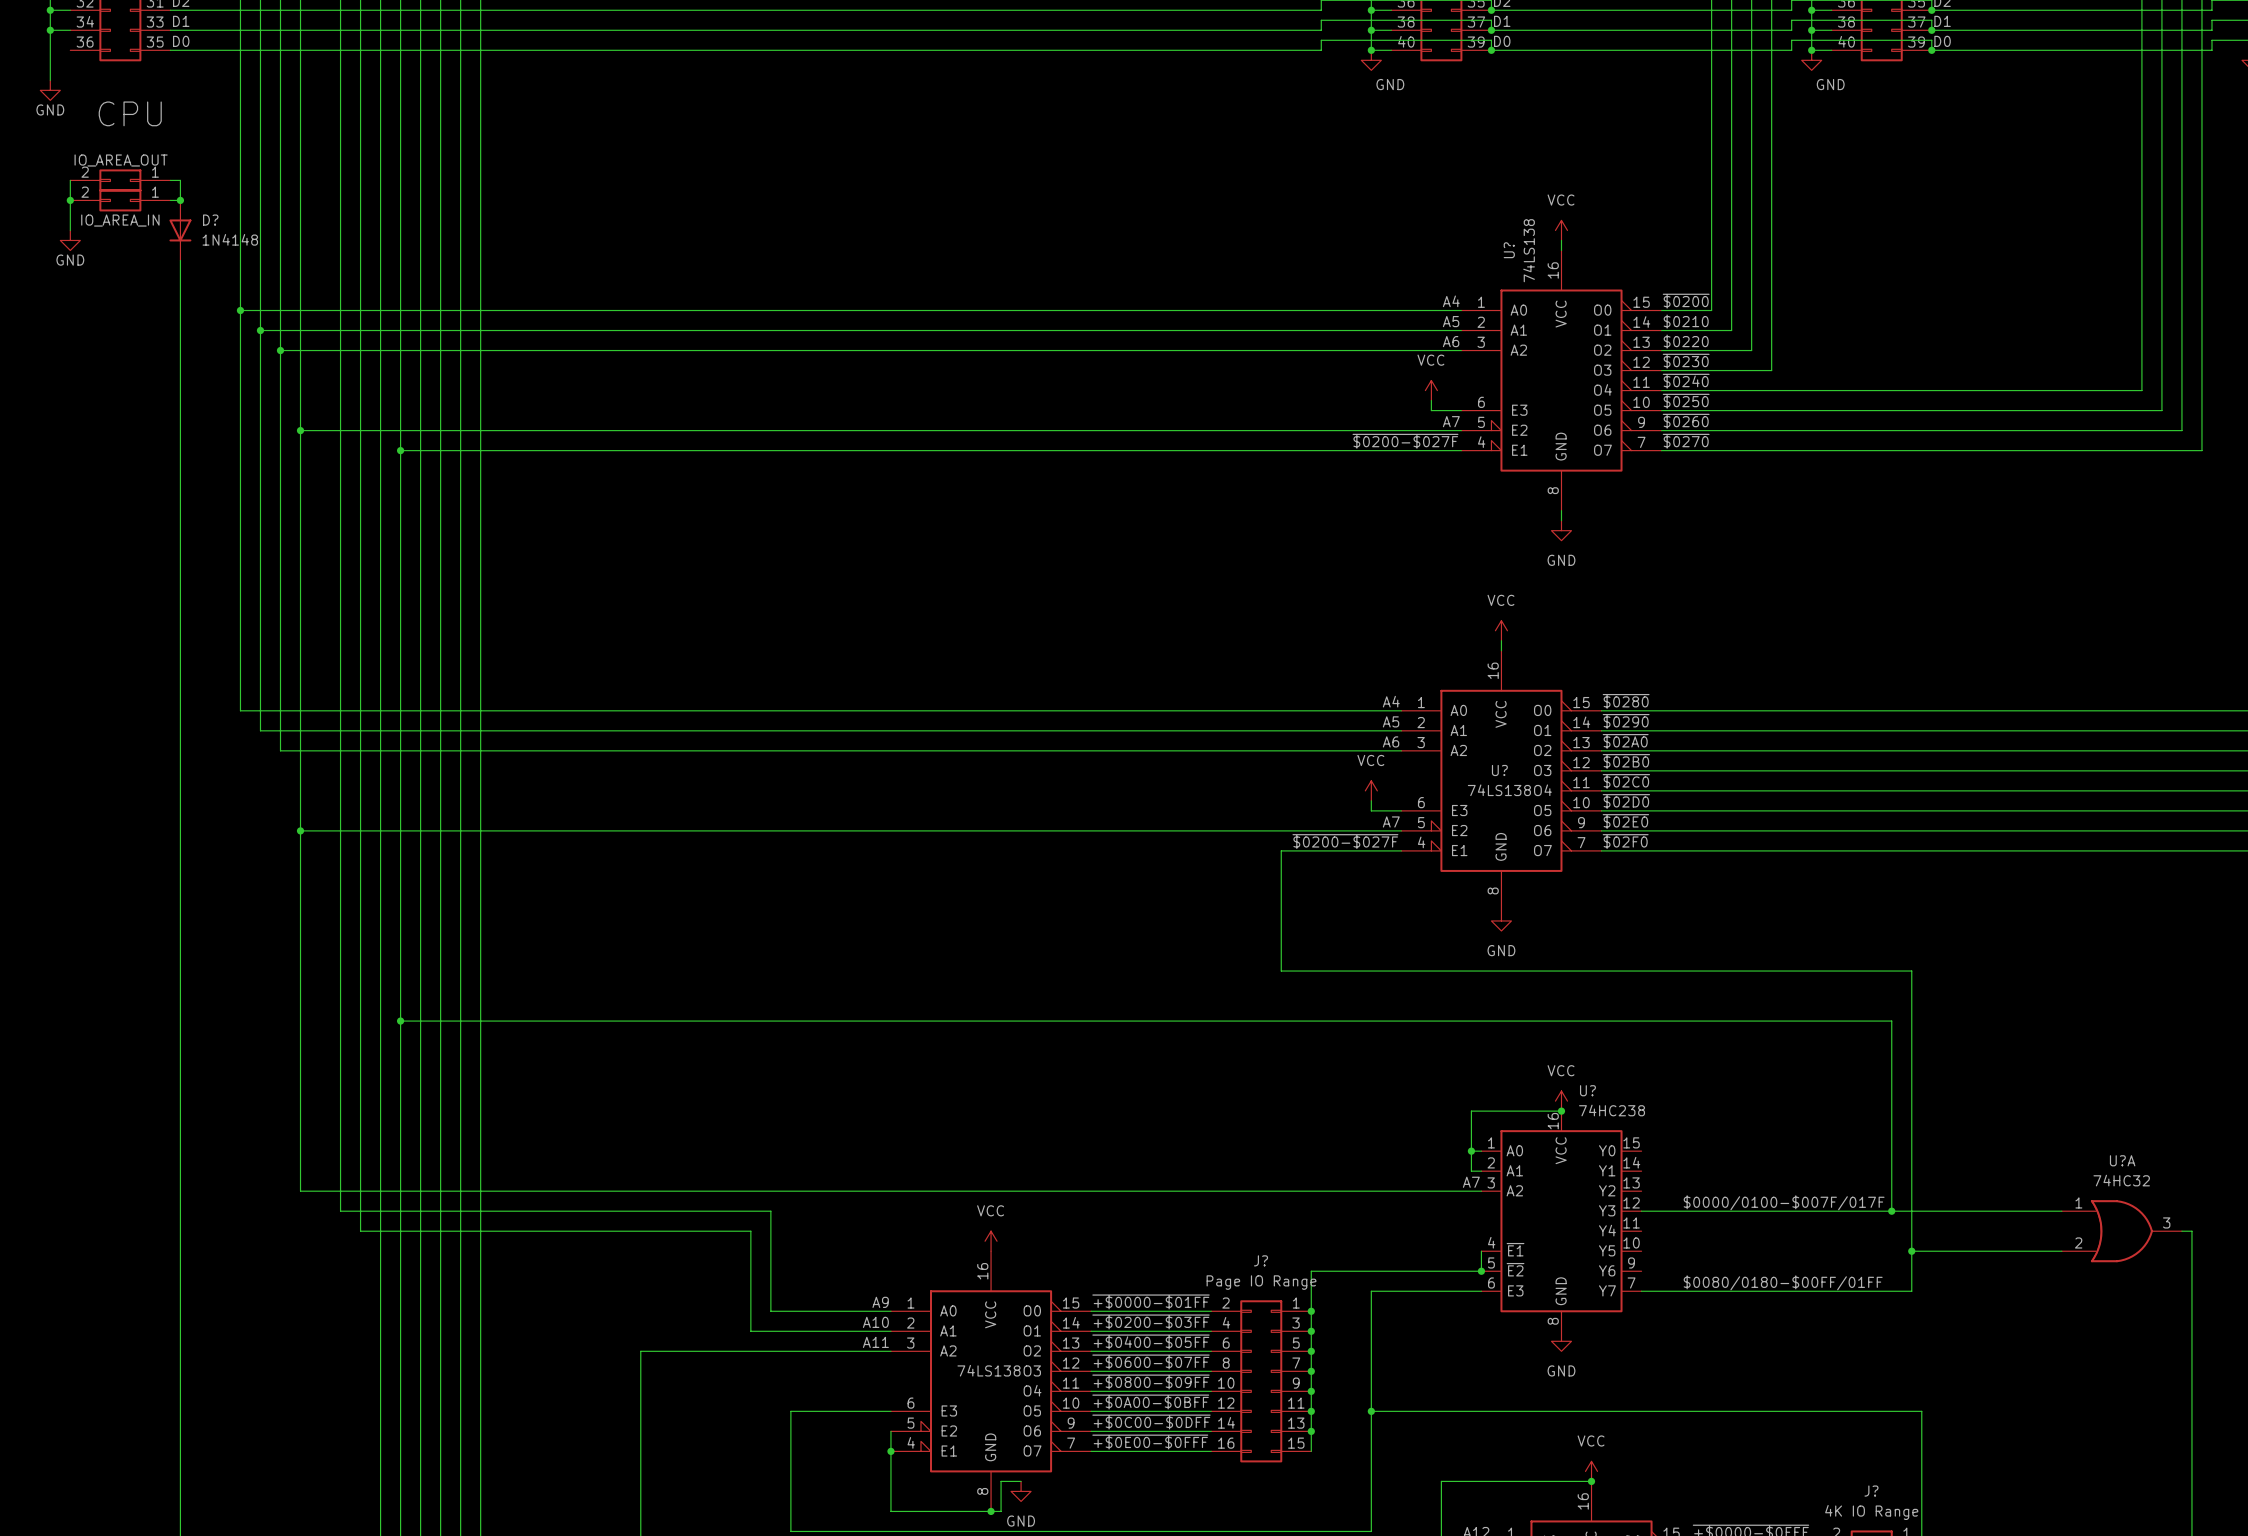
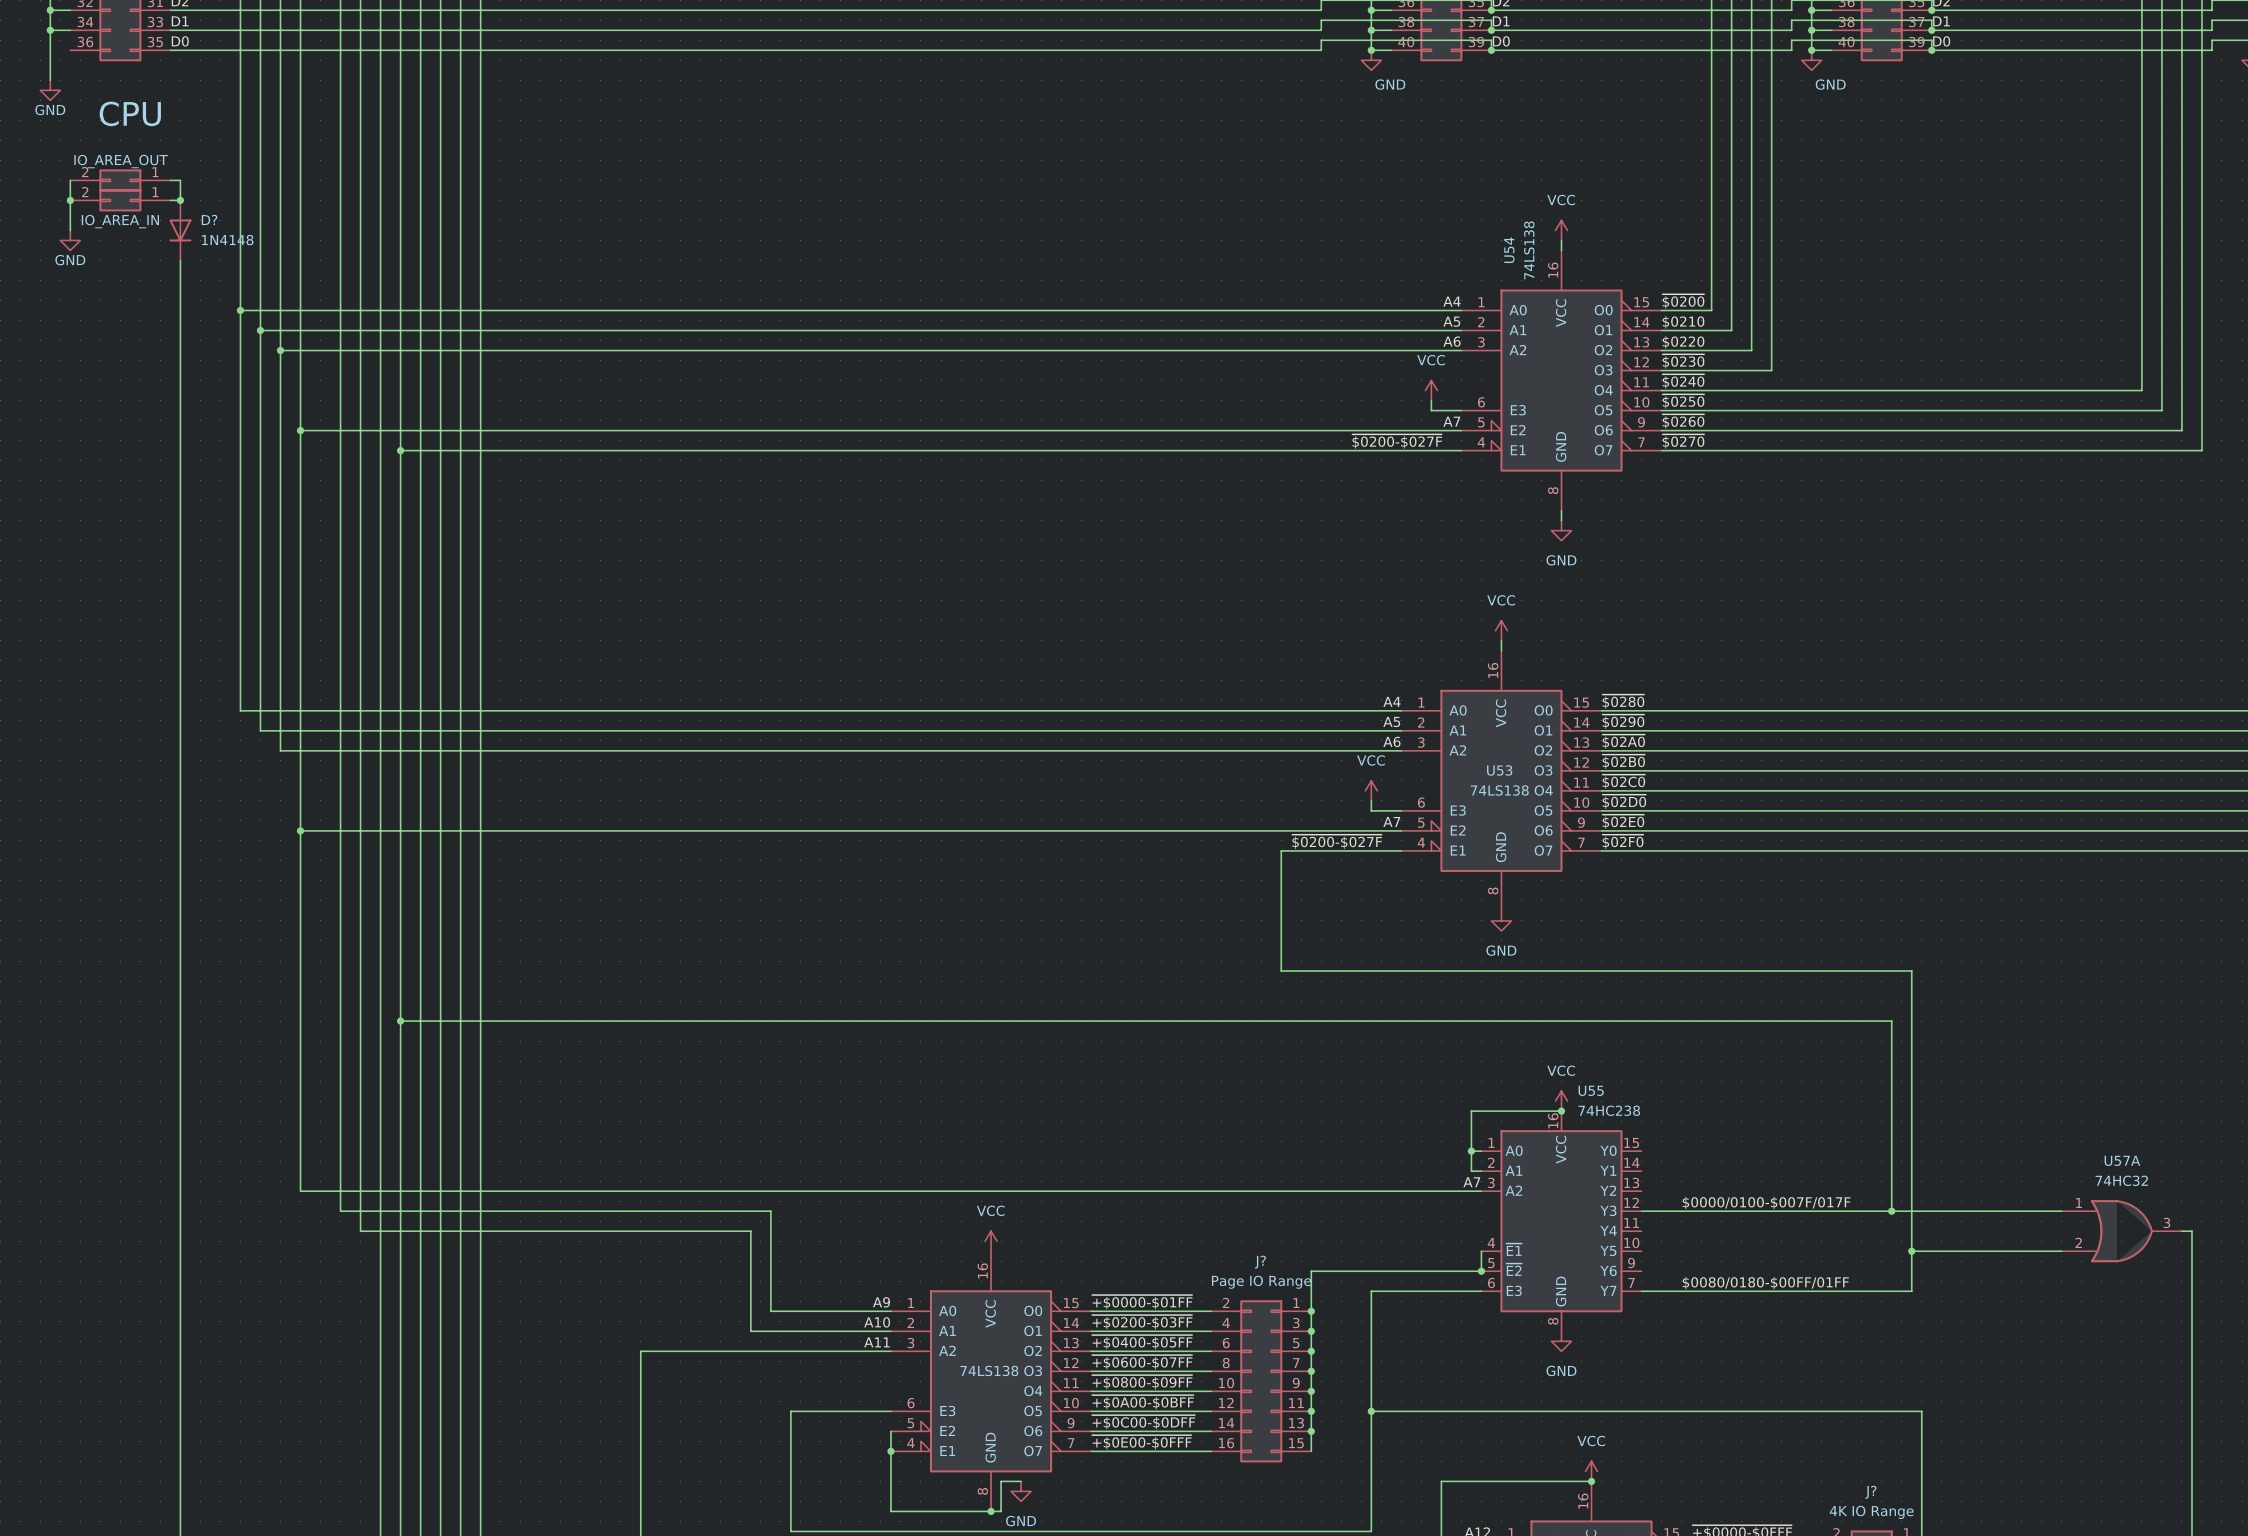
U? name: U? (1509, 250) -> U54 (1509, 250)
U? name: U? (1499, 770) -> U53 (1499, 770)
U? name: U? (1587, 1090) -> U55 (1591, 1090)
U?A name: U?A (2122, 1160) -> U57A (2122, 1160)

